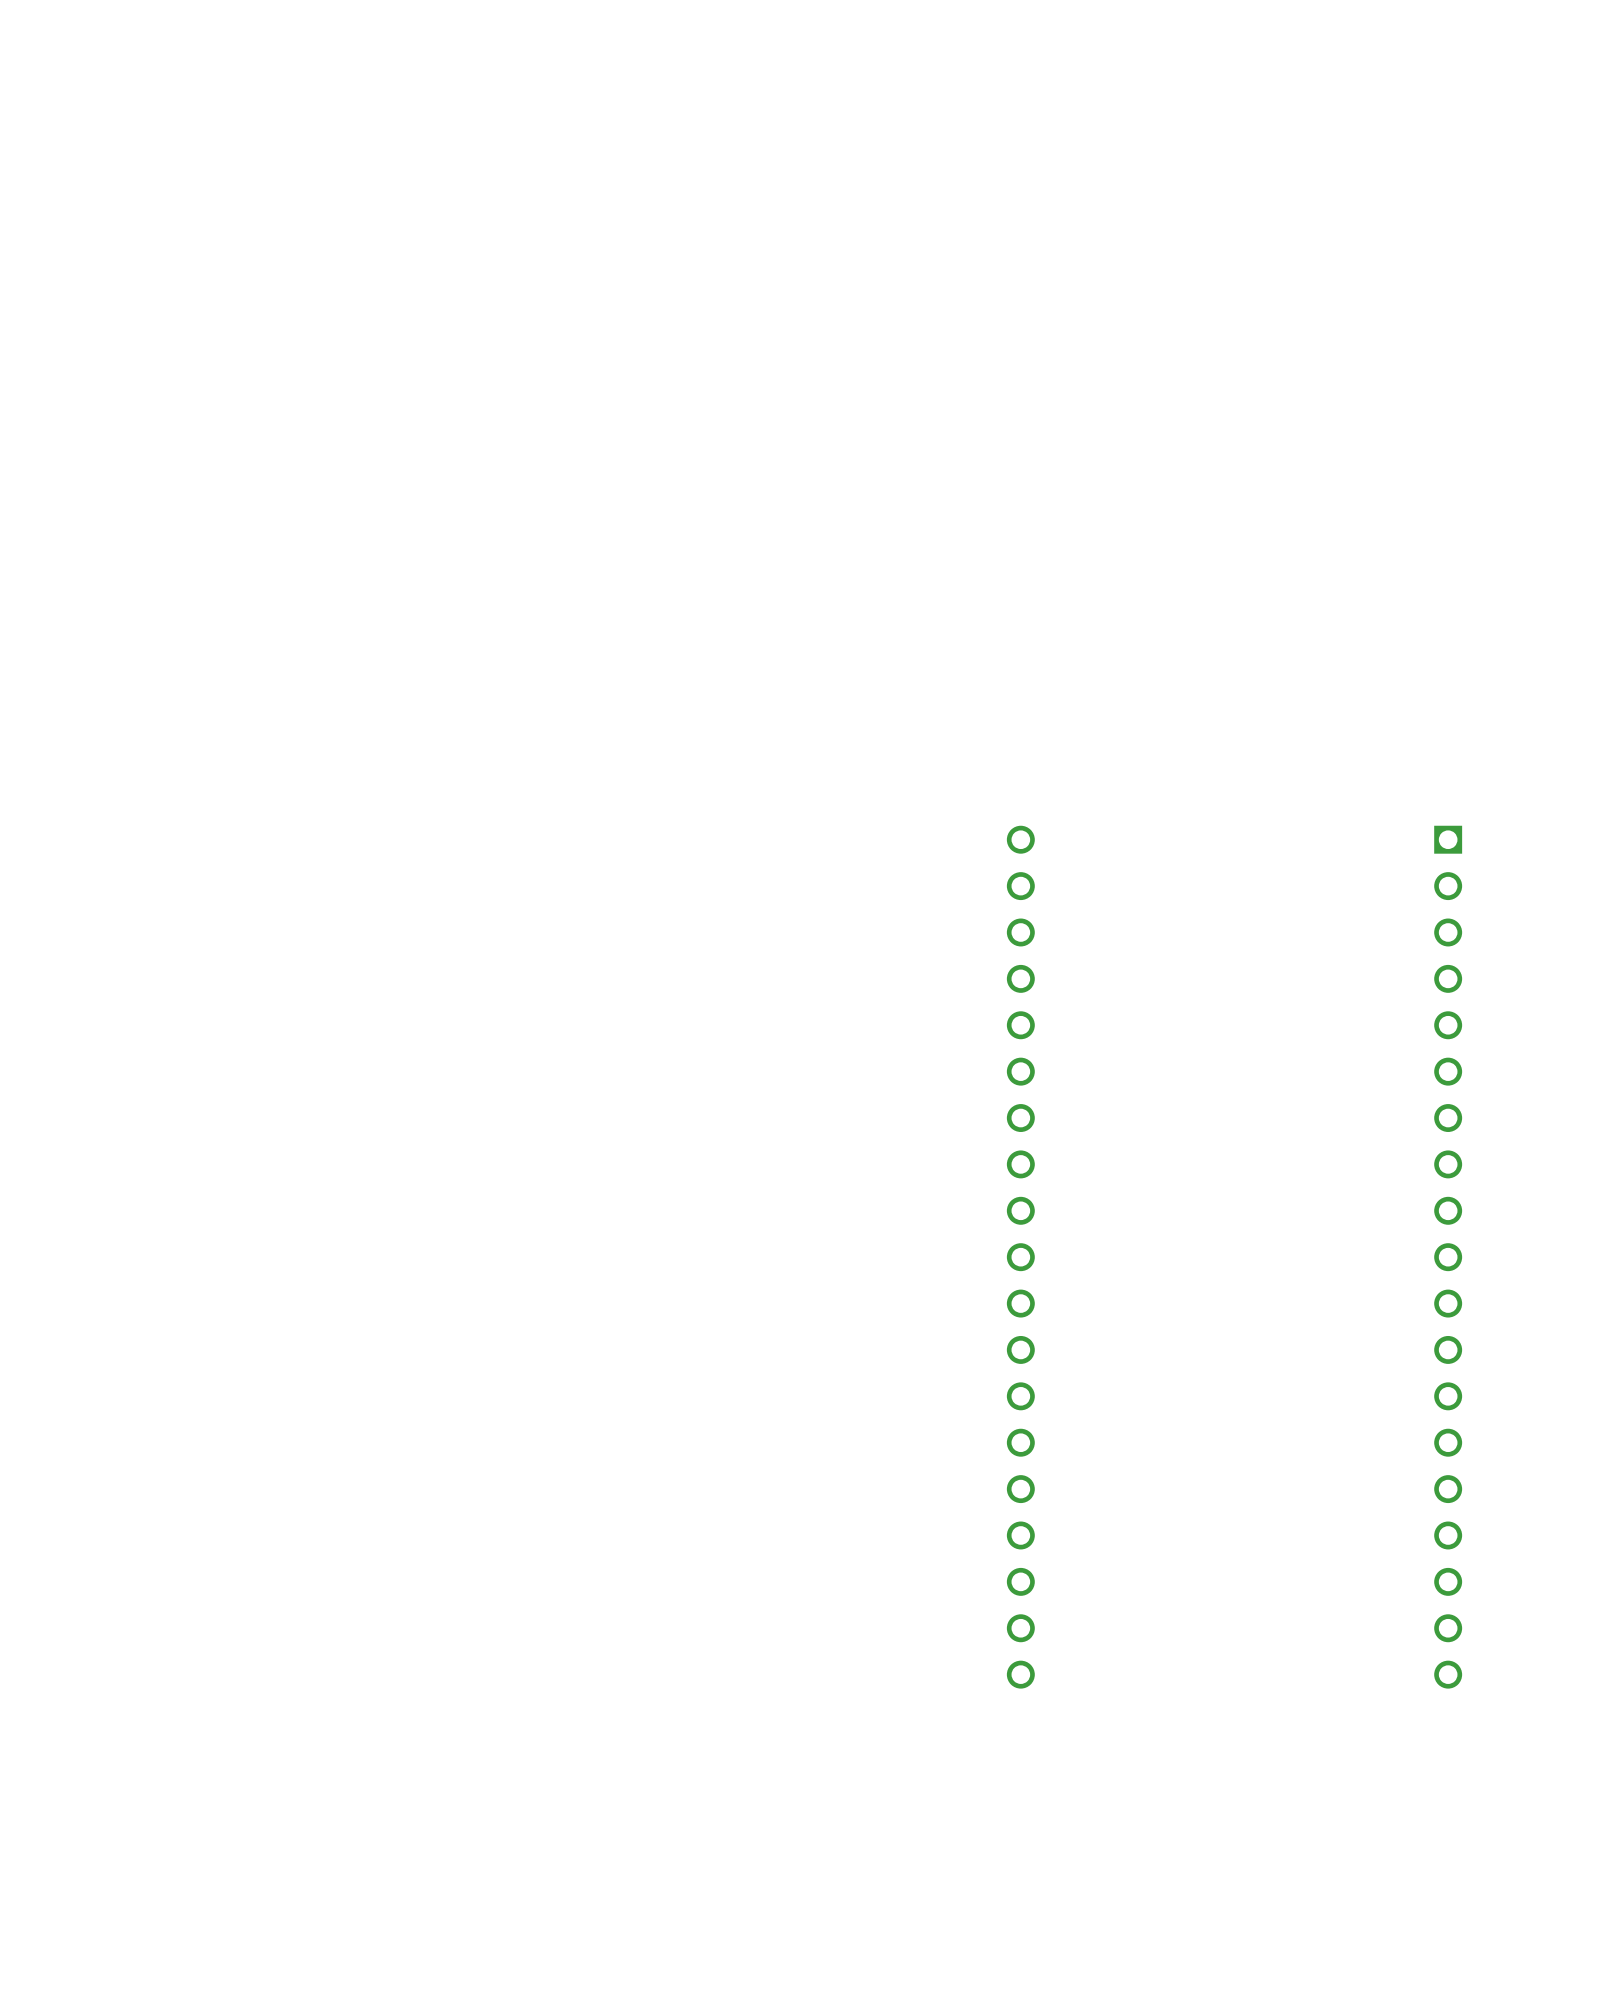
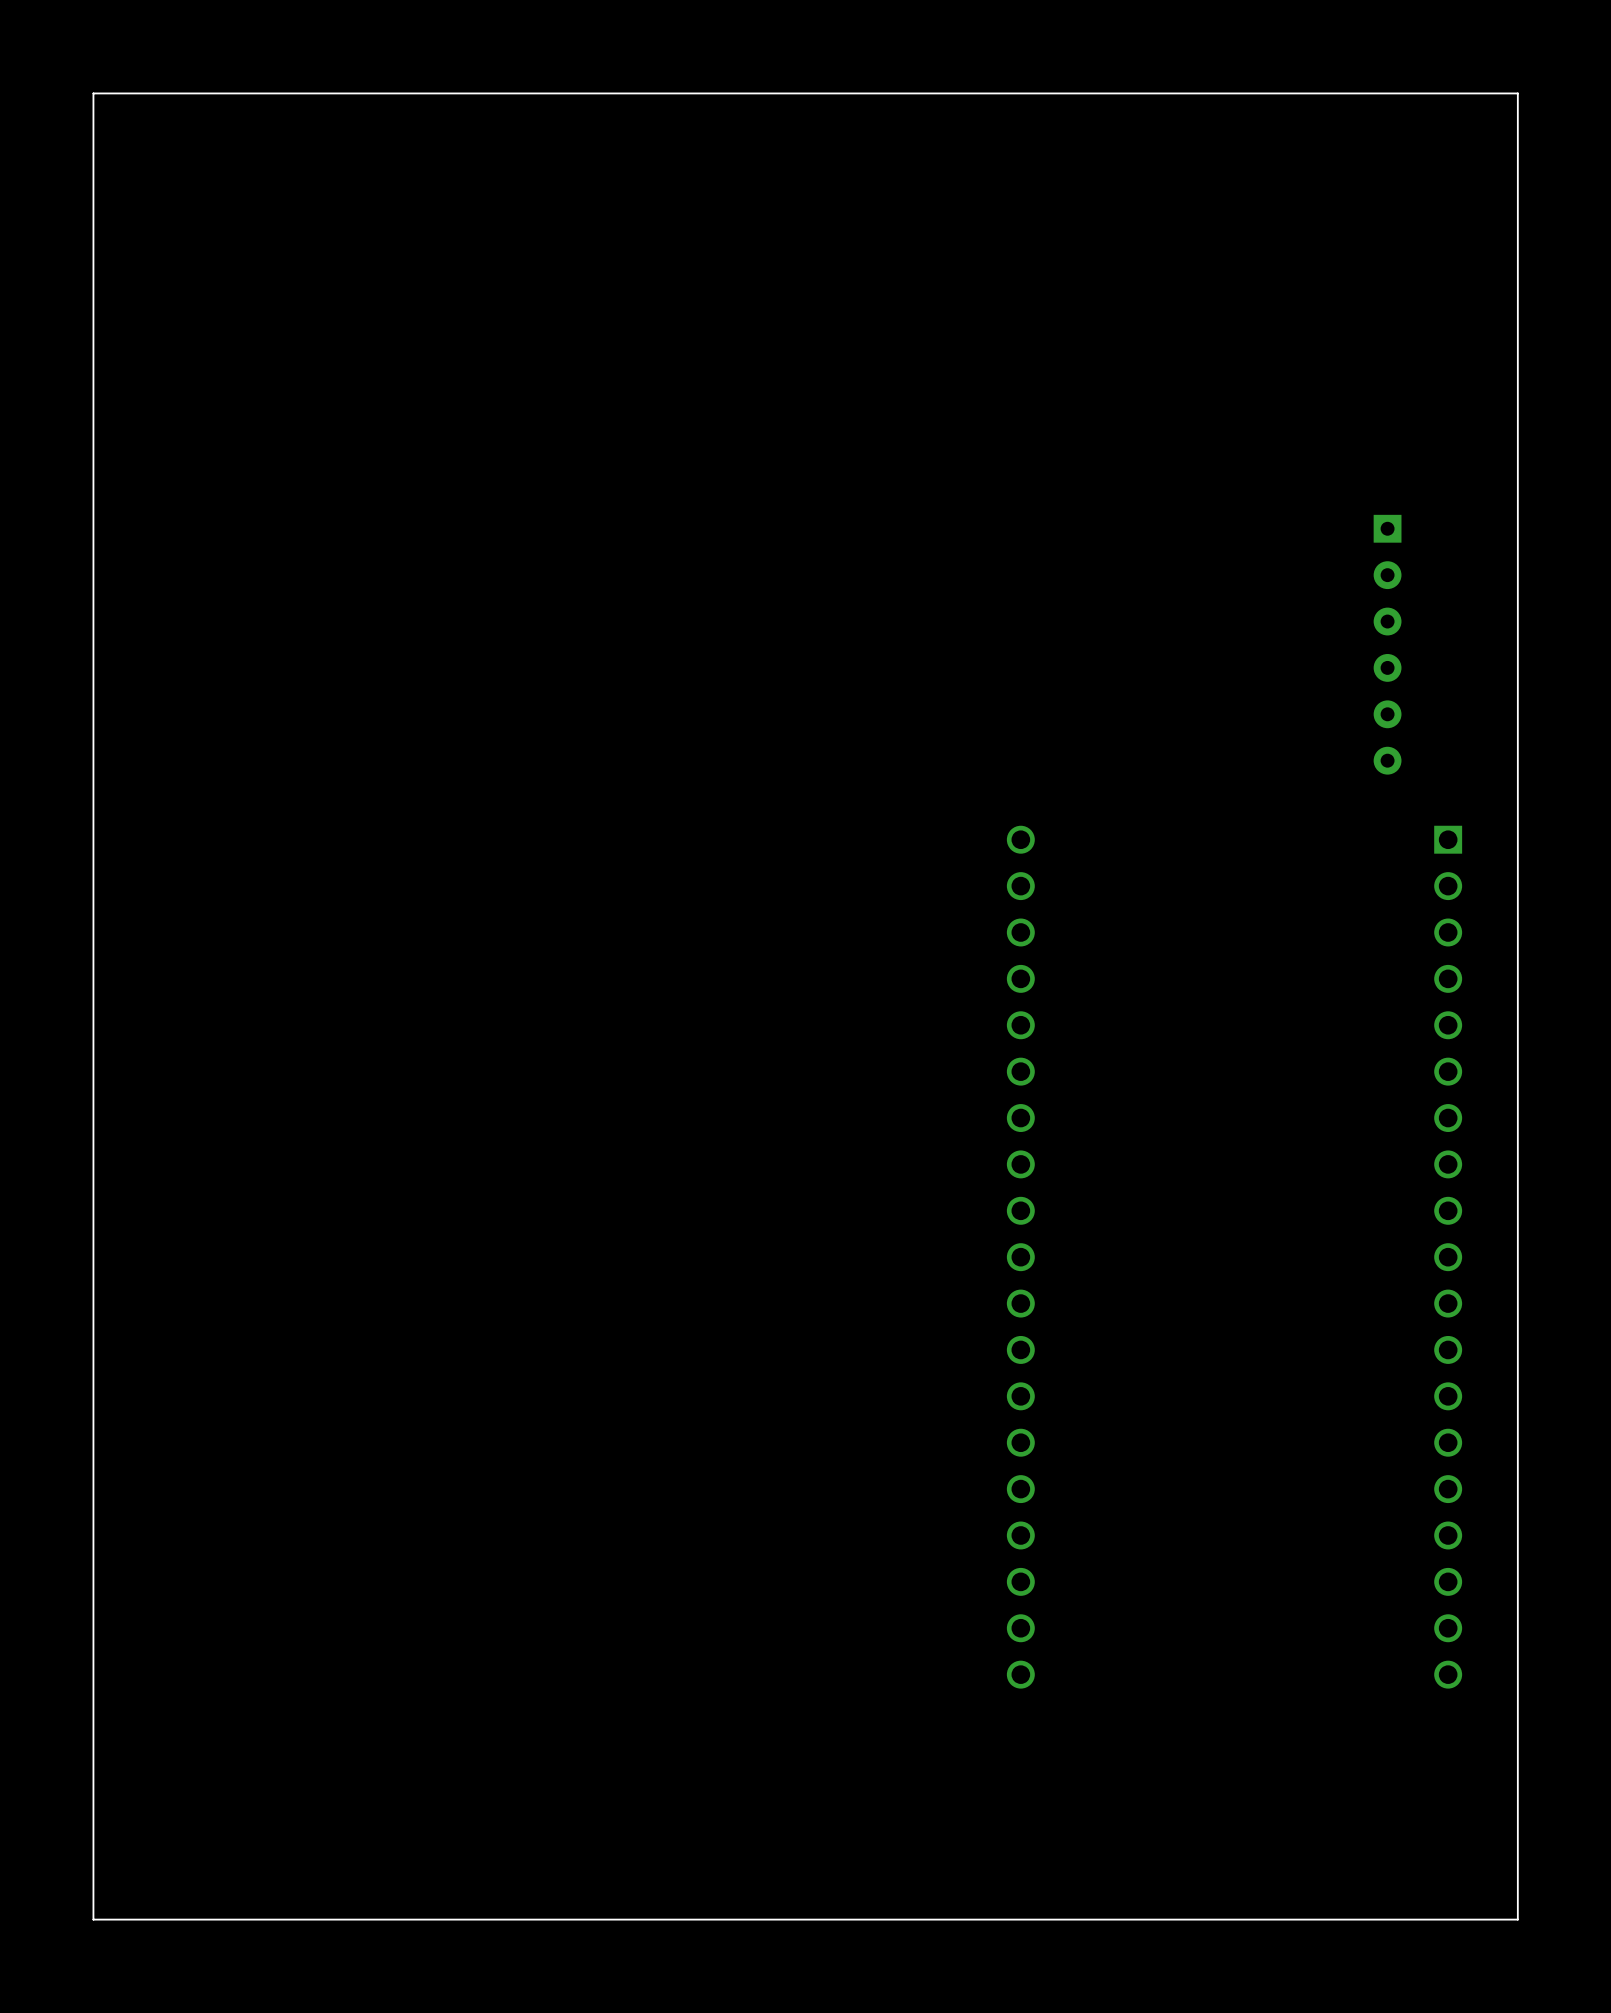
board edge: none -> (1517, 93) (93, 93) (93, 1919) (1517, 1919) (1517, 93)
part: none -> (1387, 644)

